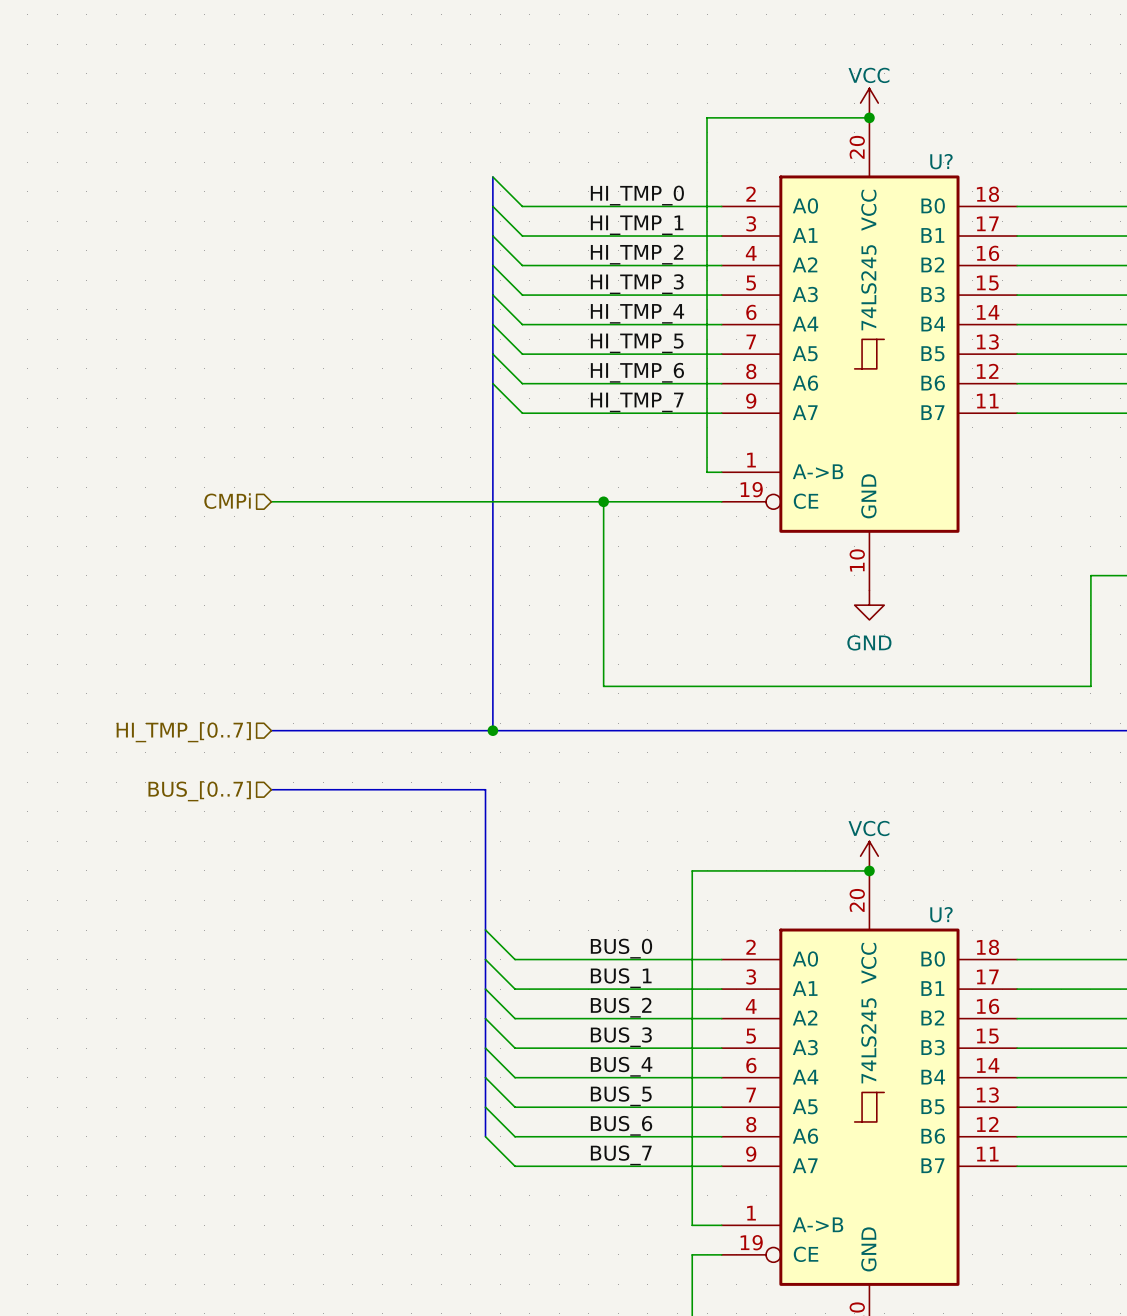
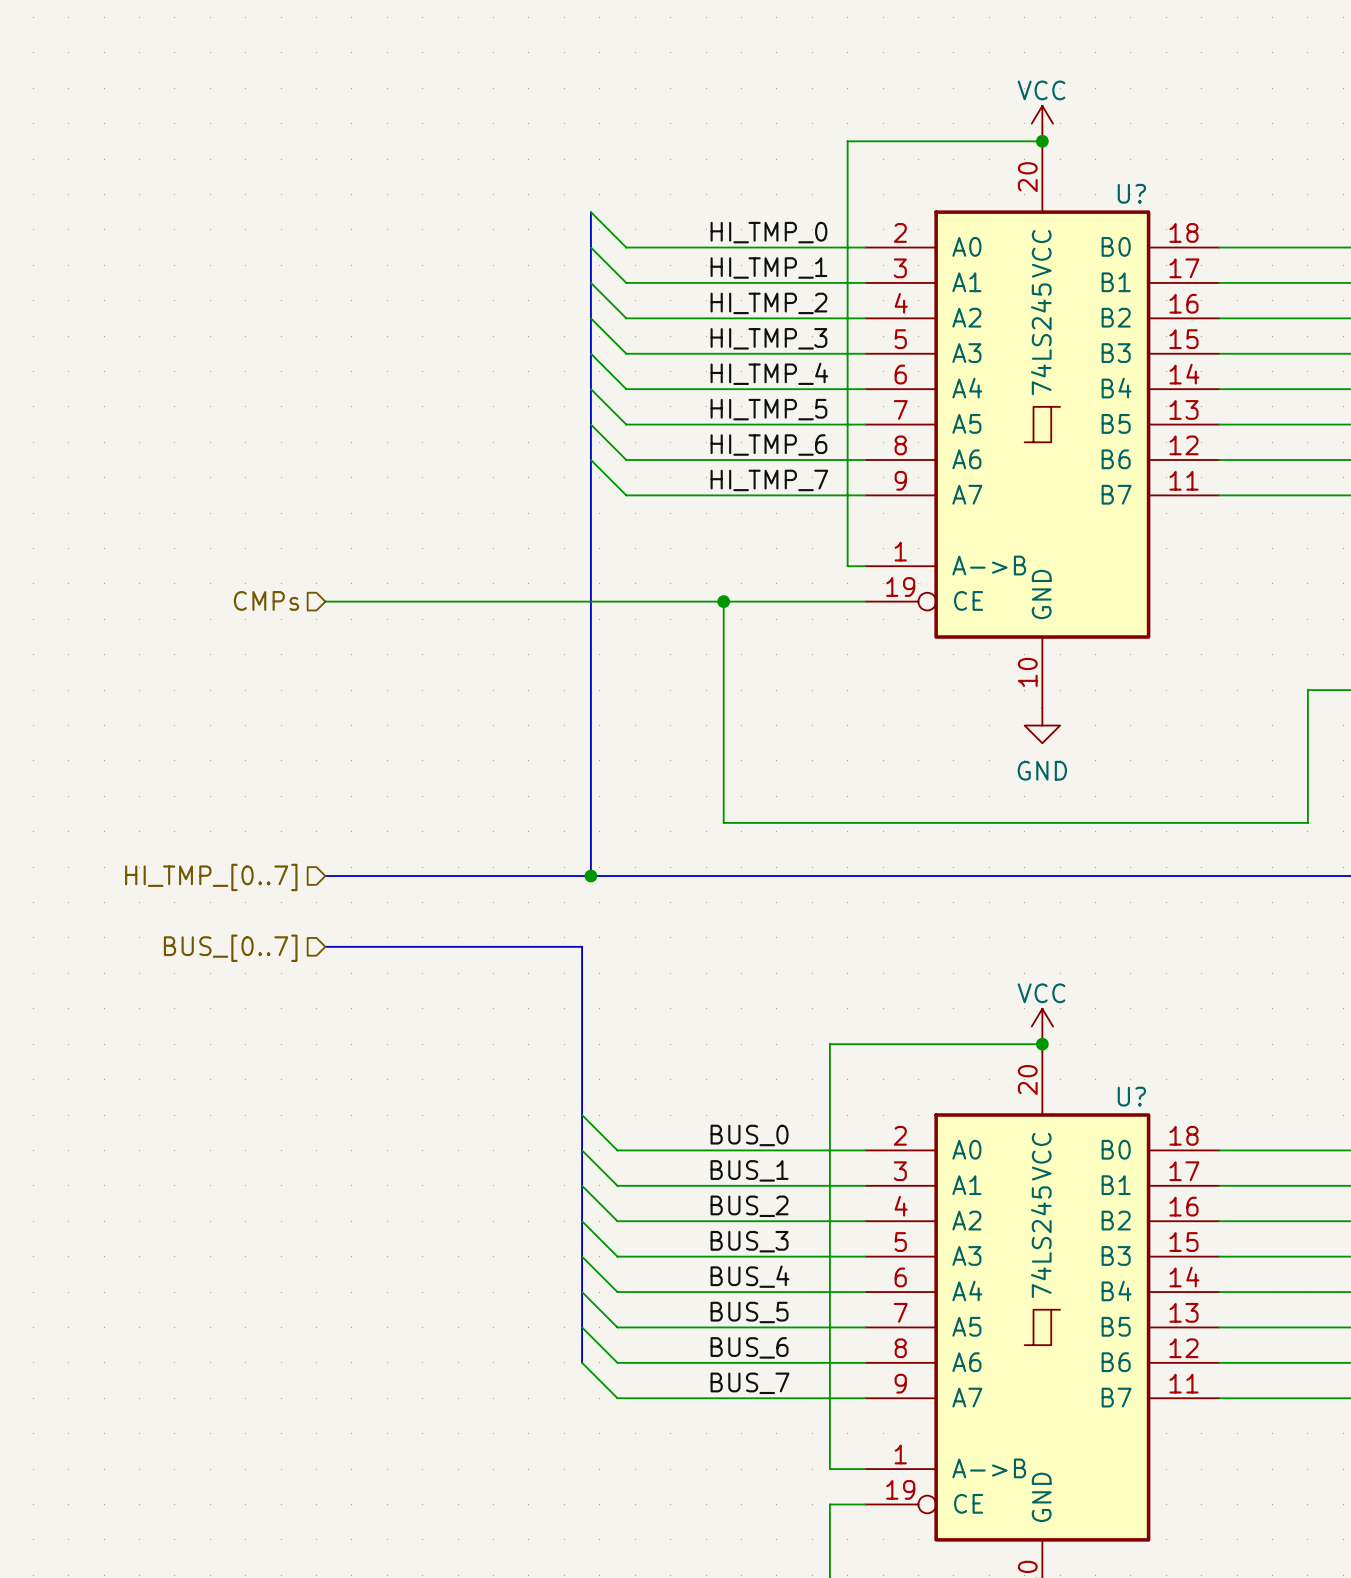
hierarchical label: CMPi (227, 501) -> CMPs (266, 600)

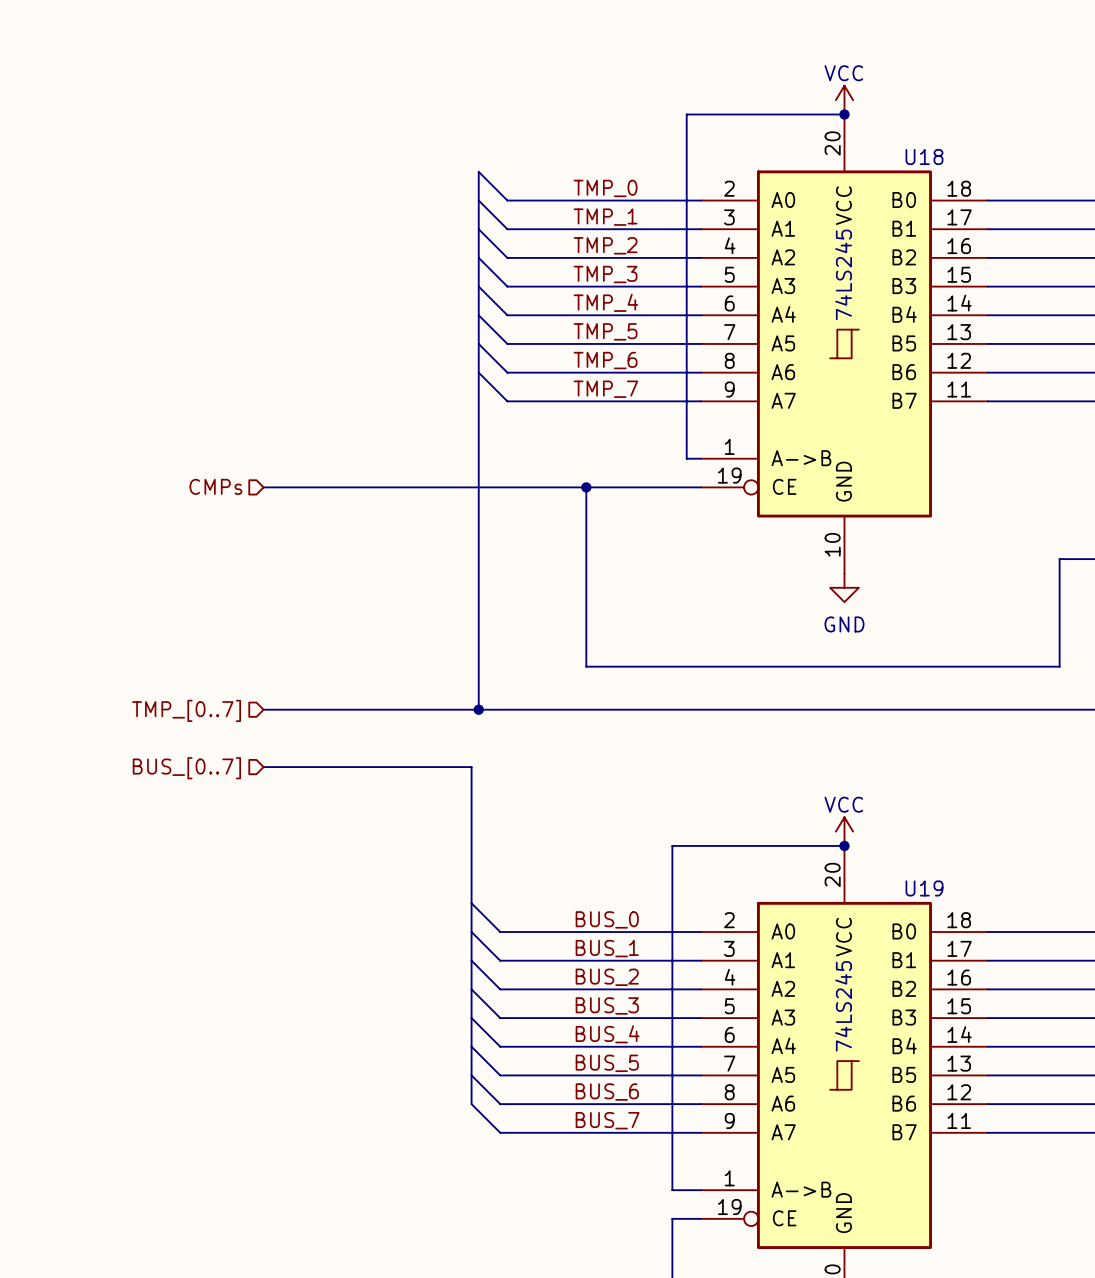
U? name: U? (1131, 193) -> U18 (924, 156)
label: HI_TMP_0 (768, 232) -> TMP_0 (605, 188)
label: HI_TMP_1 (768, 267) -> TMP_1 (605, 217)
label: HI_TMP_2 (768, 303) -> TMP_2 (605, 245)
label: HI_TMP_3 (768, 338) -> TMP_3 (605, 274)
label: HI_TMP_4 (769, 373) -> TMP_4 (605, 302)
label: HI_TMP_5 (768, 409) -> TMP_5 (605, 331)
label: HI_TMP_6 (768, 445) -> TMP_6 (605, 360)
label: HI_TMP_7 (769, 480) -> TMP_7 (605, 389)
hierarchical label: HI_TMP_[0..7] (211, 877) -> TMP_[0..7] (186, 710)
U? name: U? (1131, 1096) -> U19 (924, 888)

